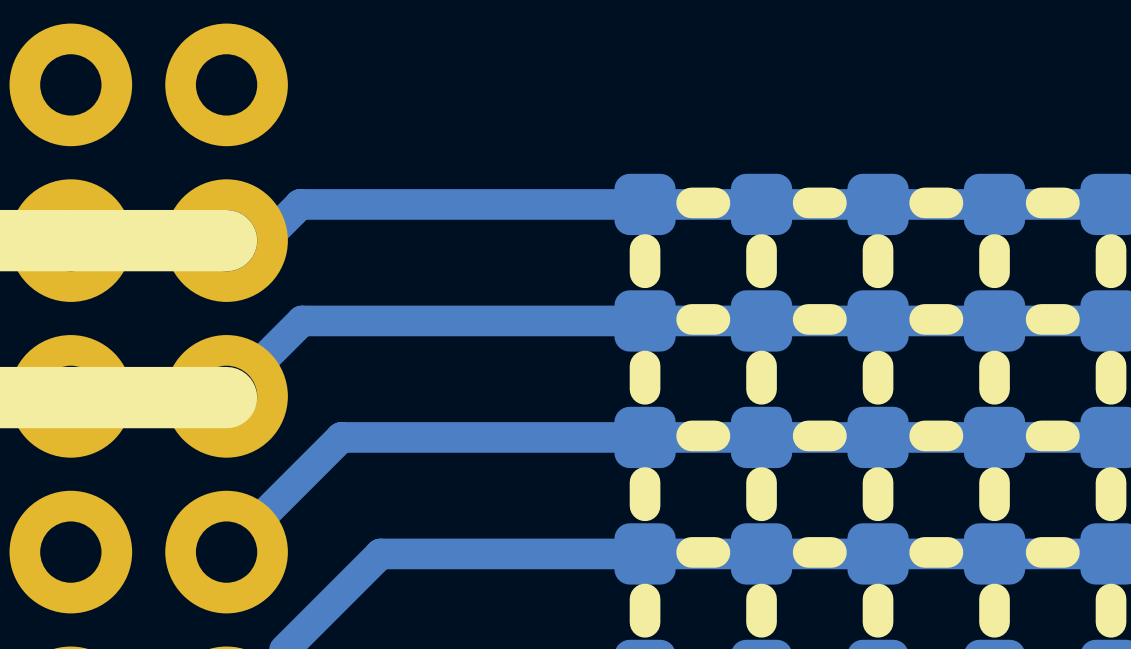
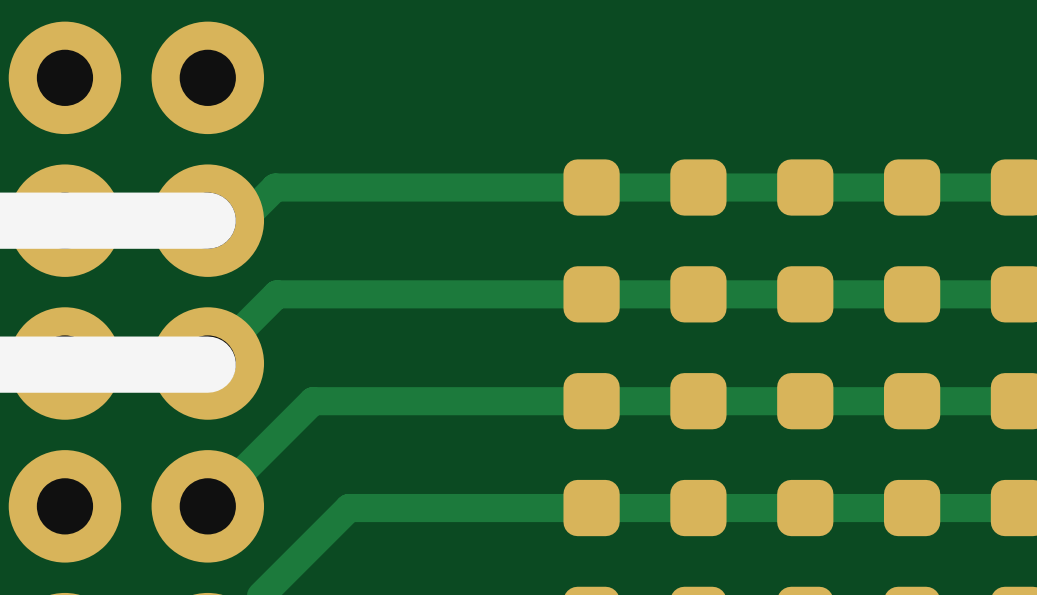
line: (714, 202) (691, 202) -> none
line: (831, 202) (808, 202) -> none
line: (947, 202) (924, 202) -> none
line: (1064, 202) (1041, 202) -> none
line: (645, 249) (645, 272) -> none
line: (761, 249) (761, 272) -> none
line: (878, 249) (878, 272) -> none
line: (994, 249) (994, 272) -> none
line: (1111, 249) (1111, 272) -> none
line: (714, 319) (691, 319) -> none
line: (831, 319) (808, 319) -> none
line: (947, 319) (924, 319) -> none
line: (1064, 319) (1041, 319) -> none
line: (645, 366) (645, 389) -> none
line: (761, 366) (761, 389) -> none
line: (878, 366) (878, 389) -> none
line: (994, 366) (994, 389) -> none
line: (1111, 366) (1111, 389) -> none
line: (714, 435) (691, 435) -> none
line: (831, 435) (808, 435) -> none
line: (947, 435) (924, 435) -> none
line: (1064, 435) (1041, 435) -> none
line: (645, 482) (645, 505) -> none
line: (761, 482) (761, 505) -> none
line: (878, 482) (878, 505) -> none
line: (994, 482) (994, 505) -> none
line: (1111, 482) (1111, 505) -> none
line: (714, 552) (691, 552) -> none
line: (831, 552) (808, 552) -> none
line: (947, 552) (924, 552) -> none
line: (1064, 552) (1041, 552) -> none
line: (645, 599) (645, 622) -> none
line: (761, 599) (761, 622) -> none
line: (878, 599) (878, 622) -> none
line: (994, 599) (994, 622) -> none
line: (1111, 599) (1111, 622) -> none

